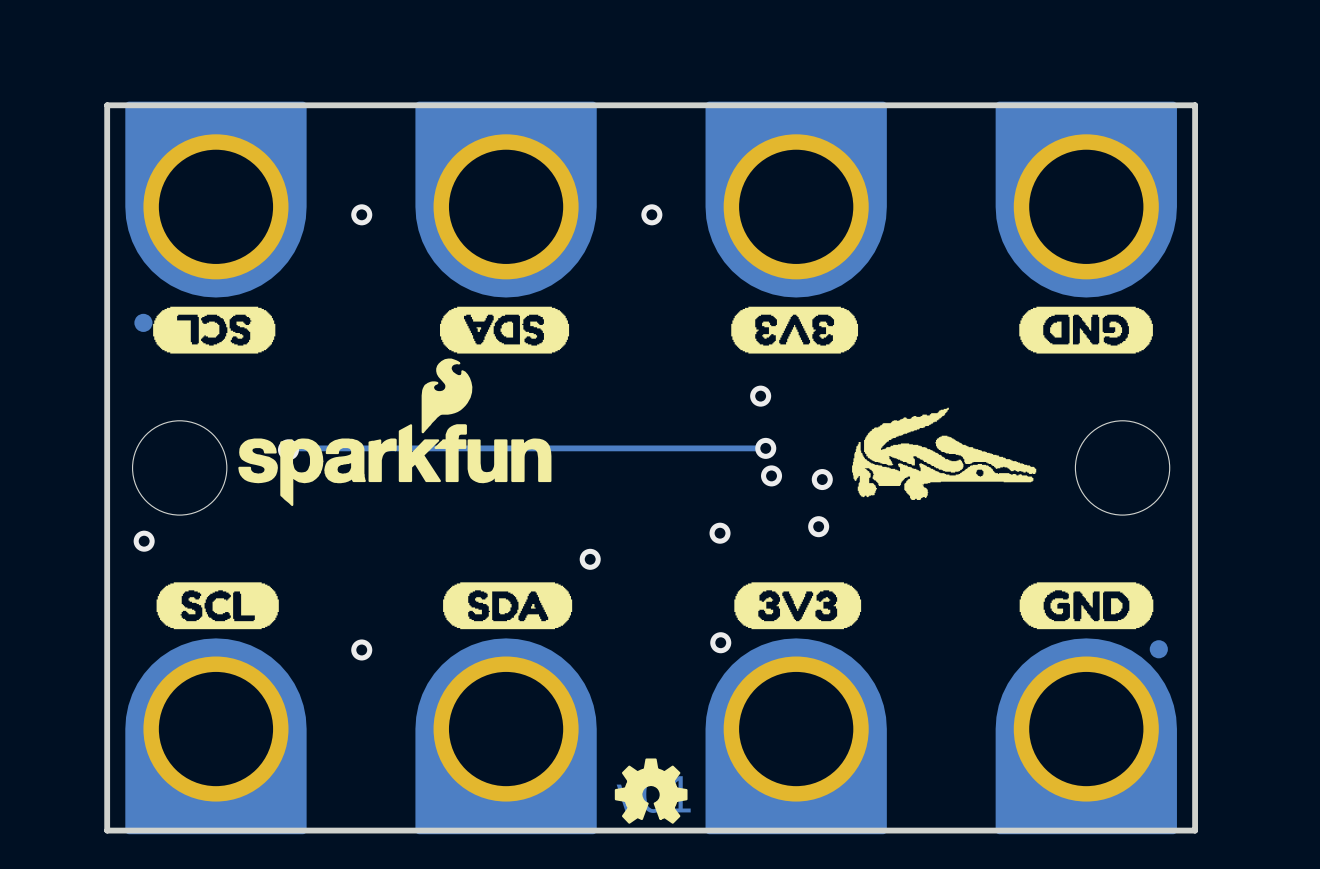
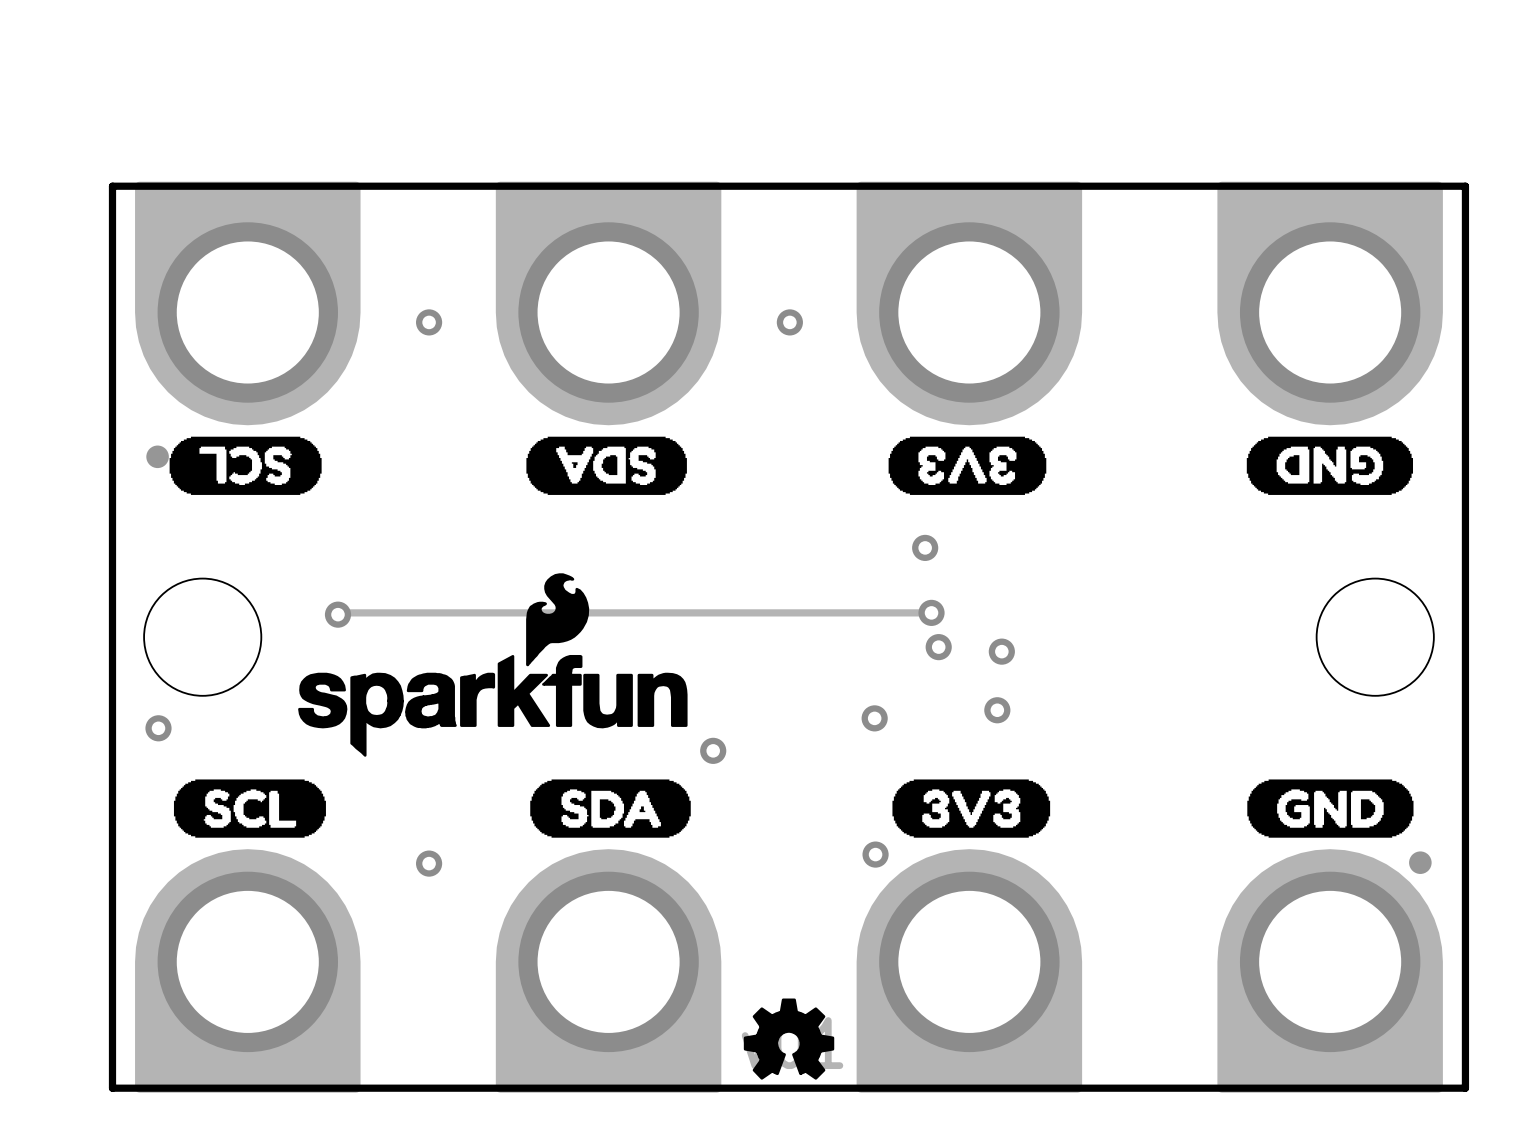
drawing: [852, 407, 1037, 500] -> none
drawing position: (394, 432) -> (492, 665)

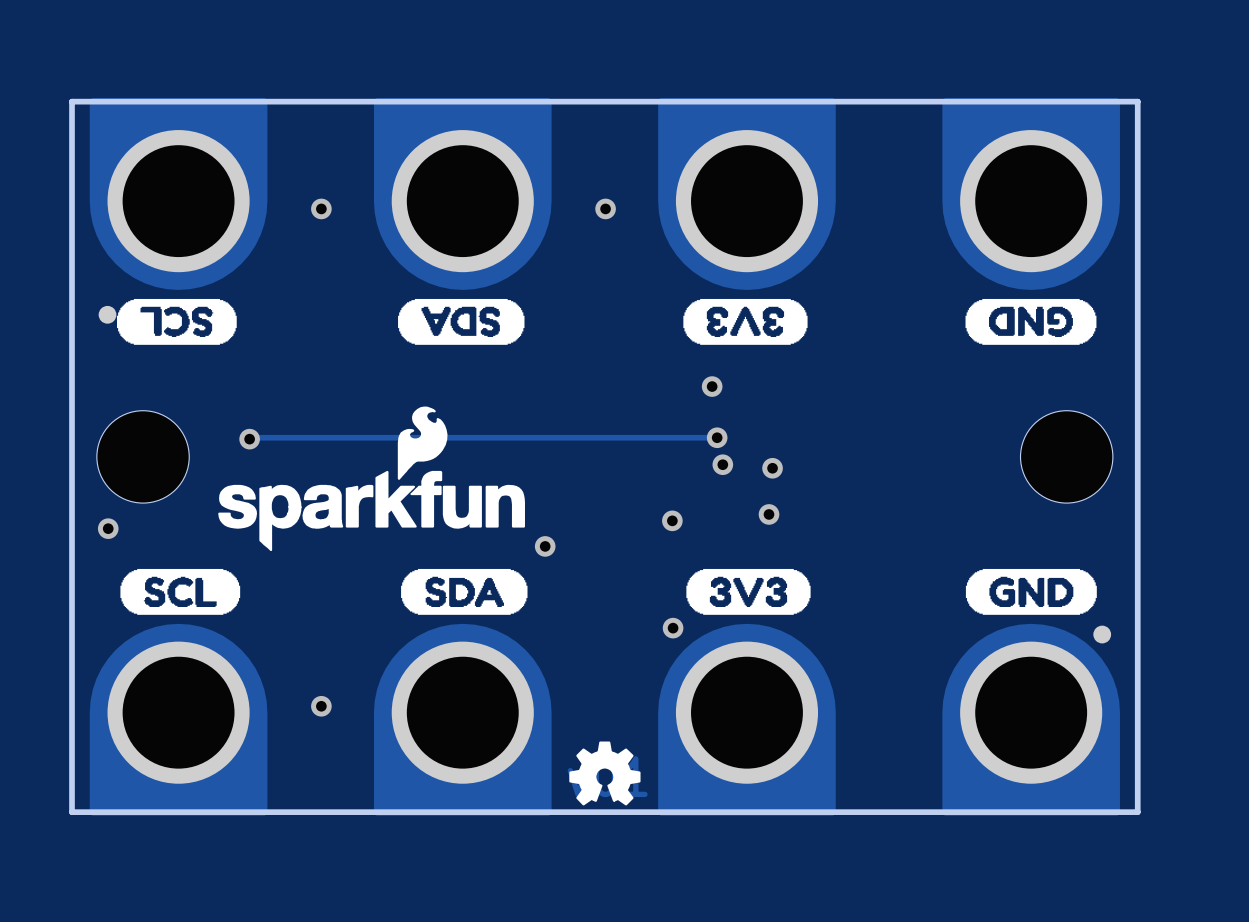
via position: (429, 863) -> (321, 706)

